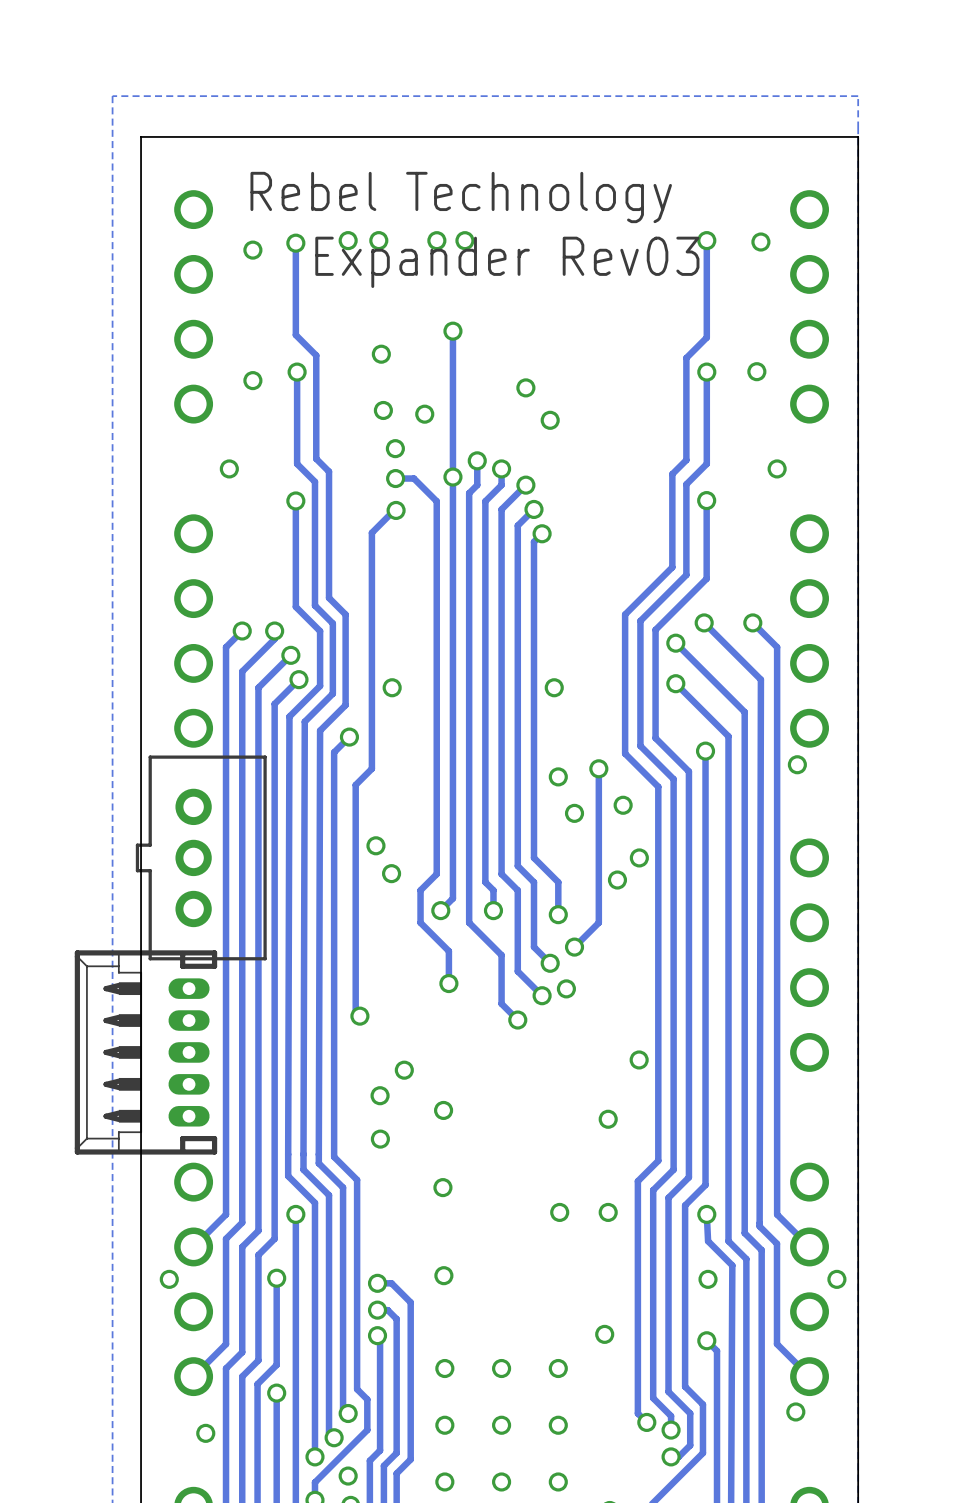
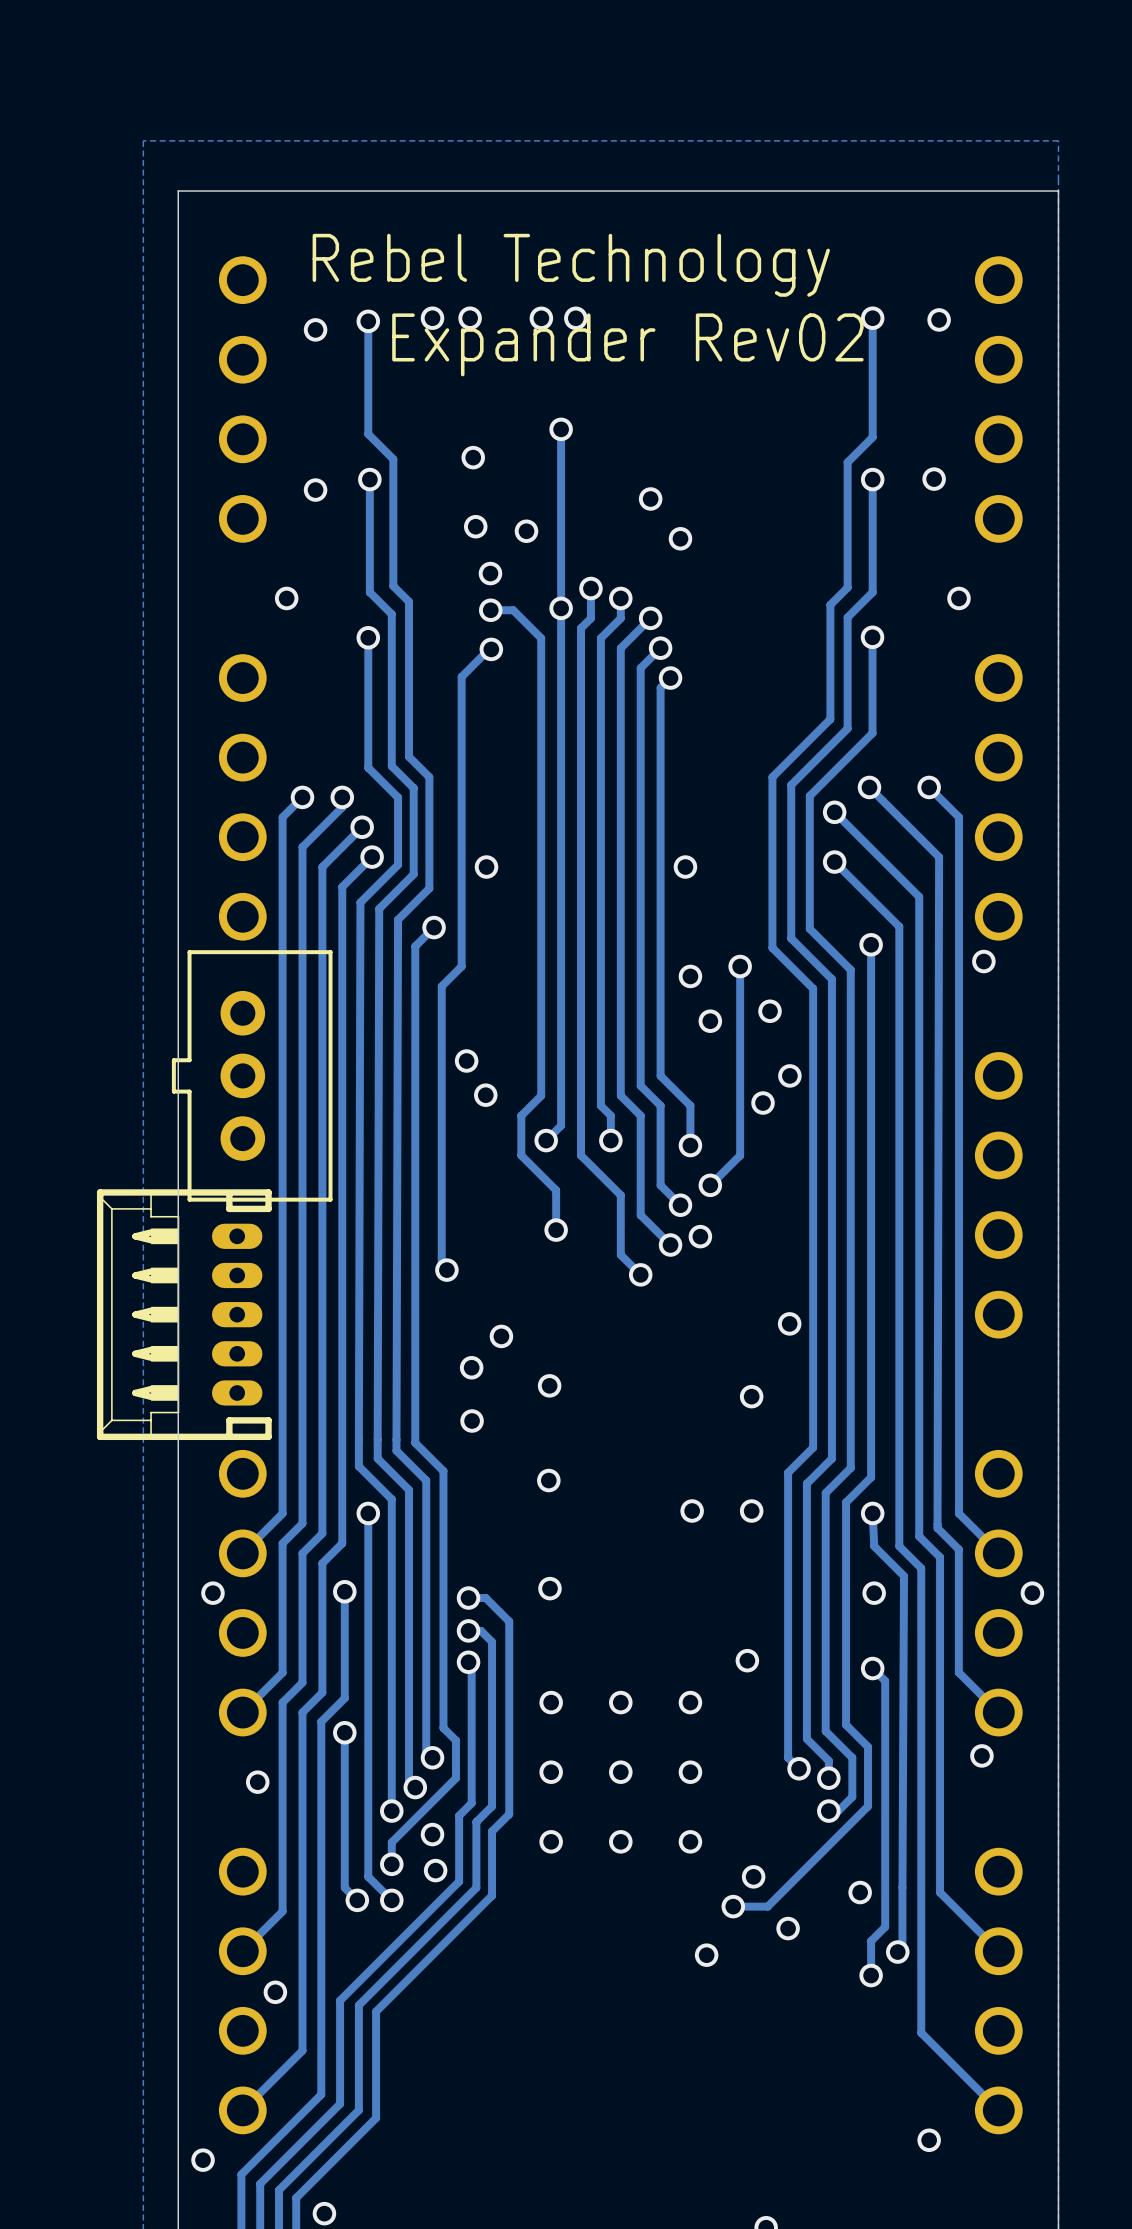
text: Expander Rev03 (507, 262) -> Expander Rev02 (627, 344)

